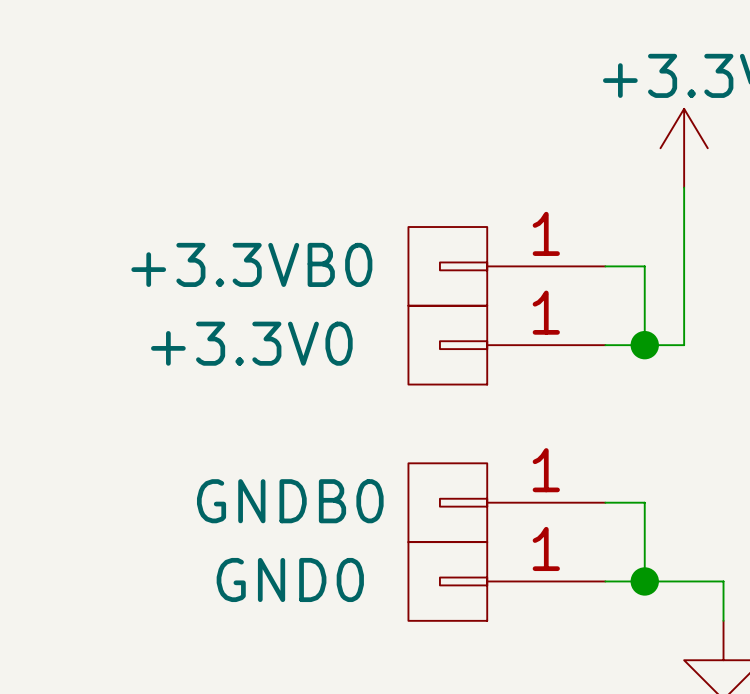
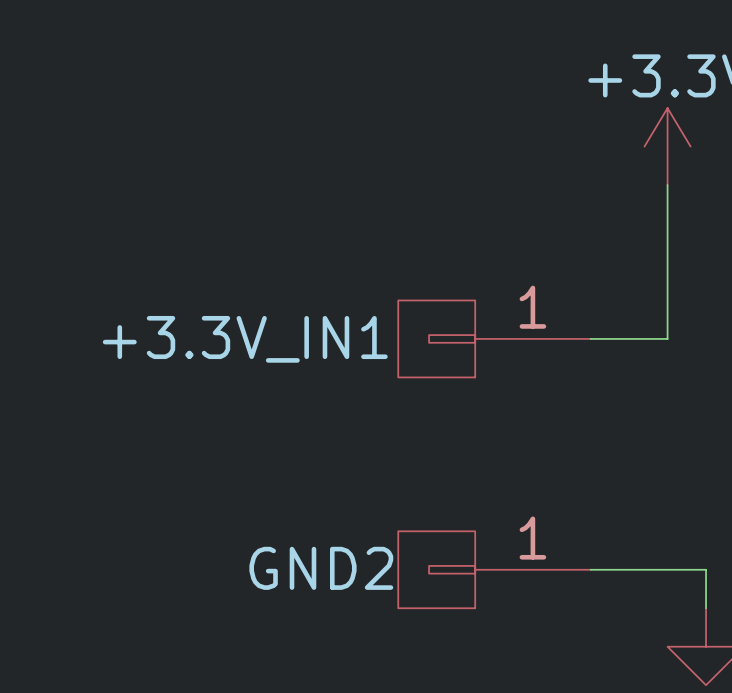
+3.3VB0: (506, 266) -> none
wire: (605, 266) (644, 266) (644, 345) -> none
+3.3V0 name: +3.3V0 (251, 343) -> +3.3V_IN1 (245, 339)
junction: (644, 345) -> none
GNDB0: (506, 502) -> none
wire: (605, 502) (644, 502) (644, 581) -> none
GND0 name: GND0 (290, 579) -> GND2 (321, 568)
junction: (644, 581) -> none

